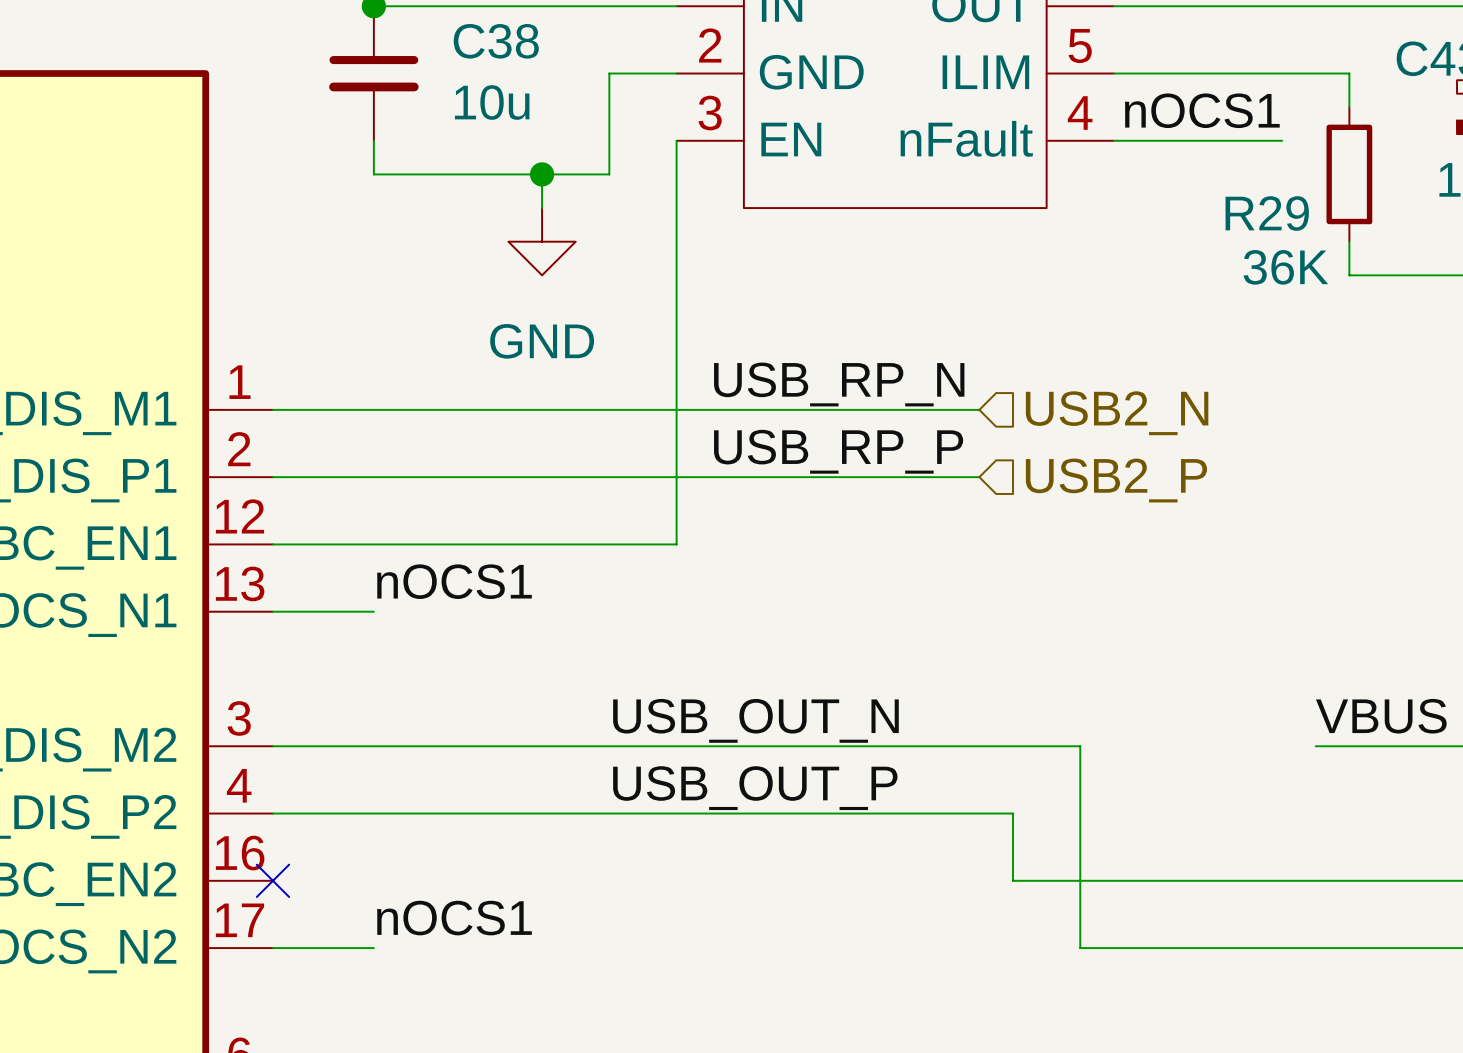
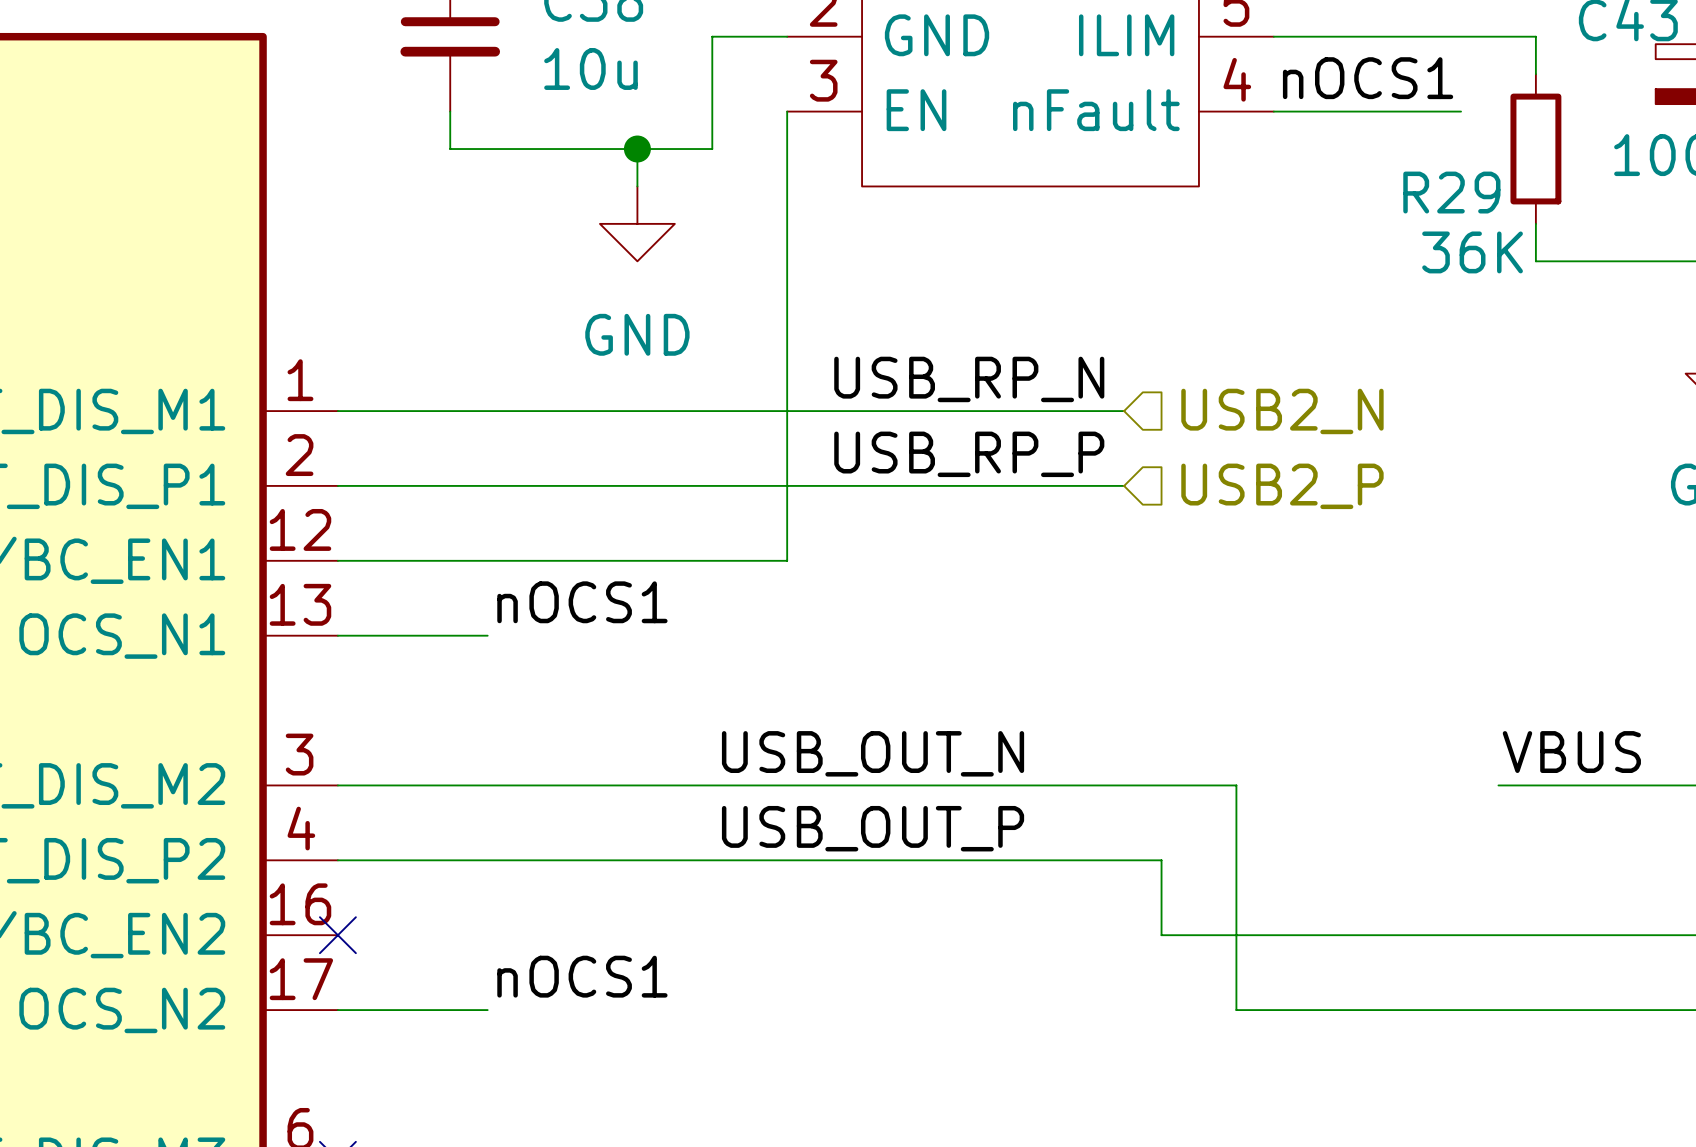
label position: nOCS1 (454, 581) -> nOCS1 (582, 602)
wire: none -> (450, 635) (487, 635)
label position: nOCS1 (454, 918) -> nOCS1 (582, 976)
wire: none -> (450, 1010) (487, 1010)

